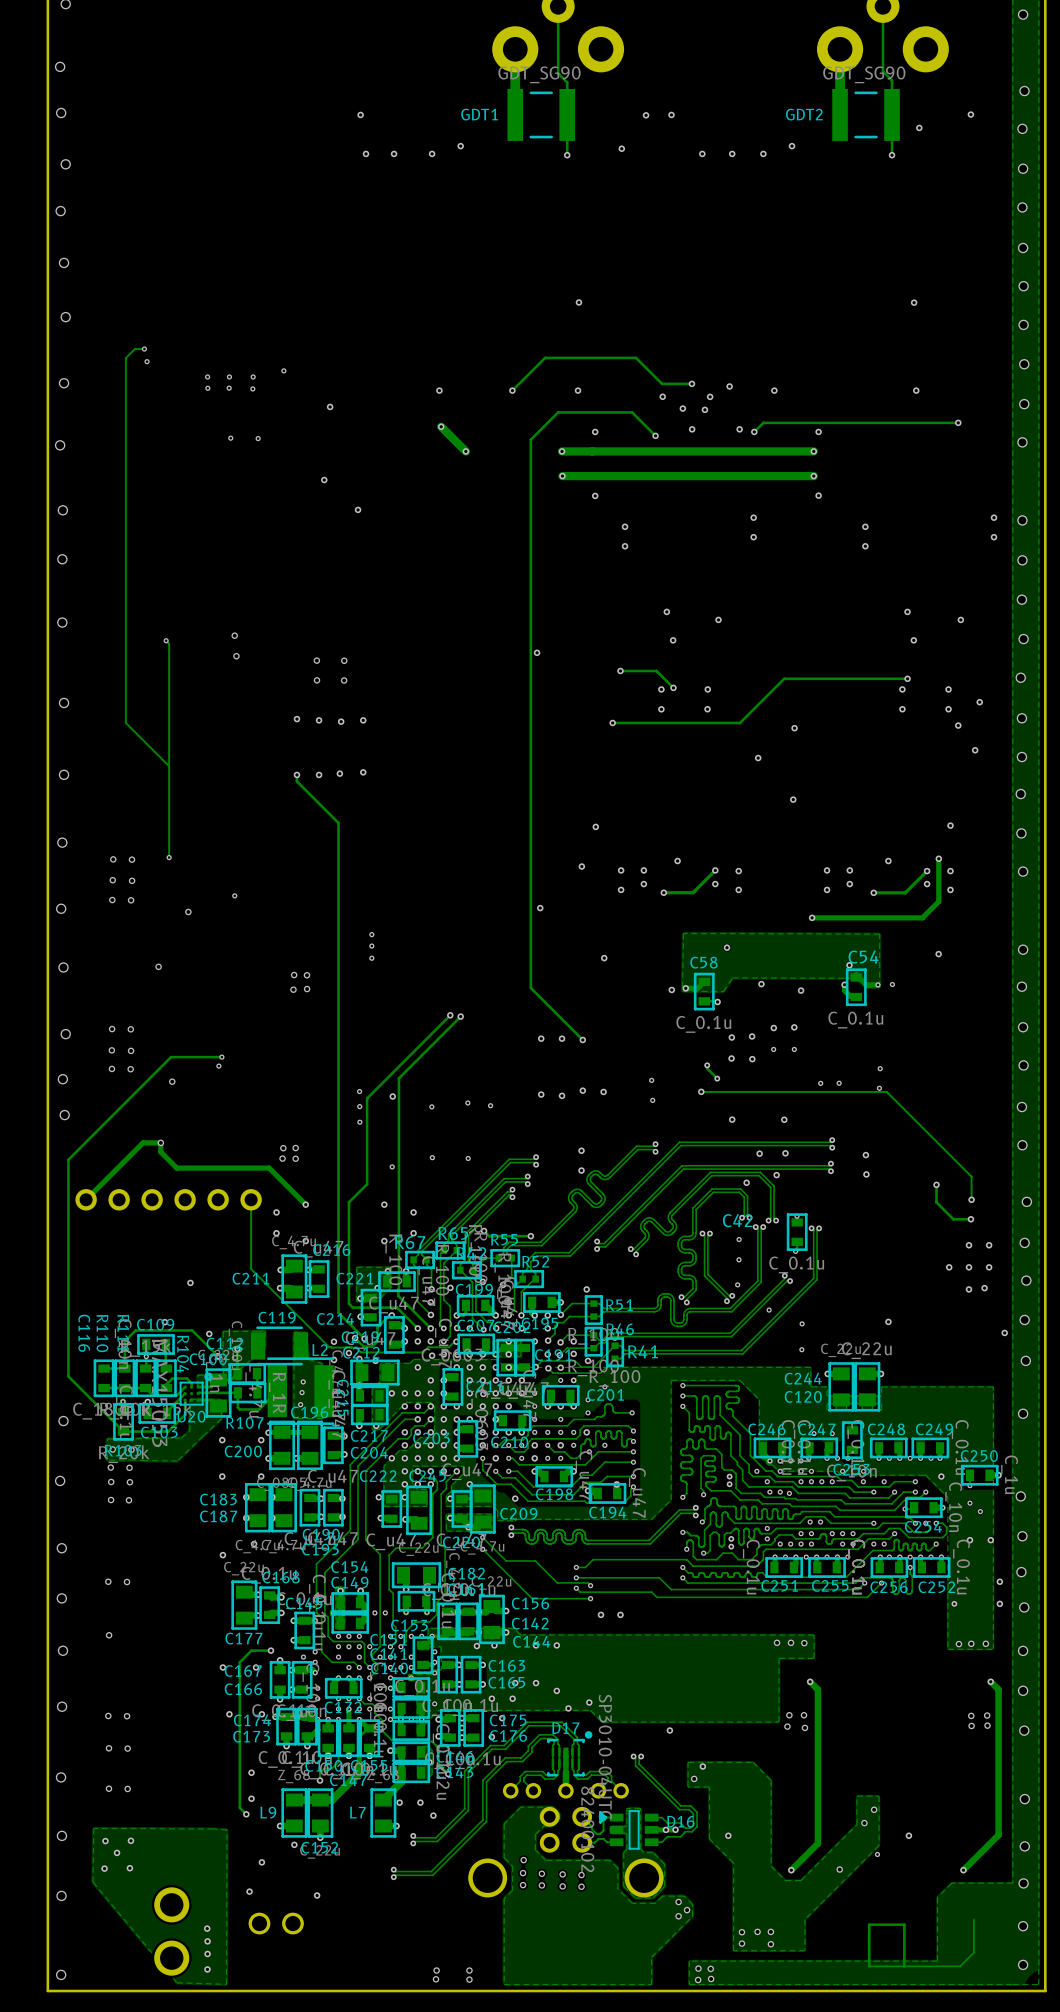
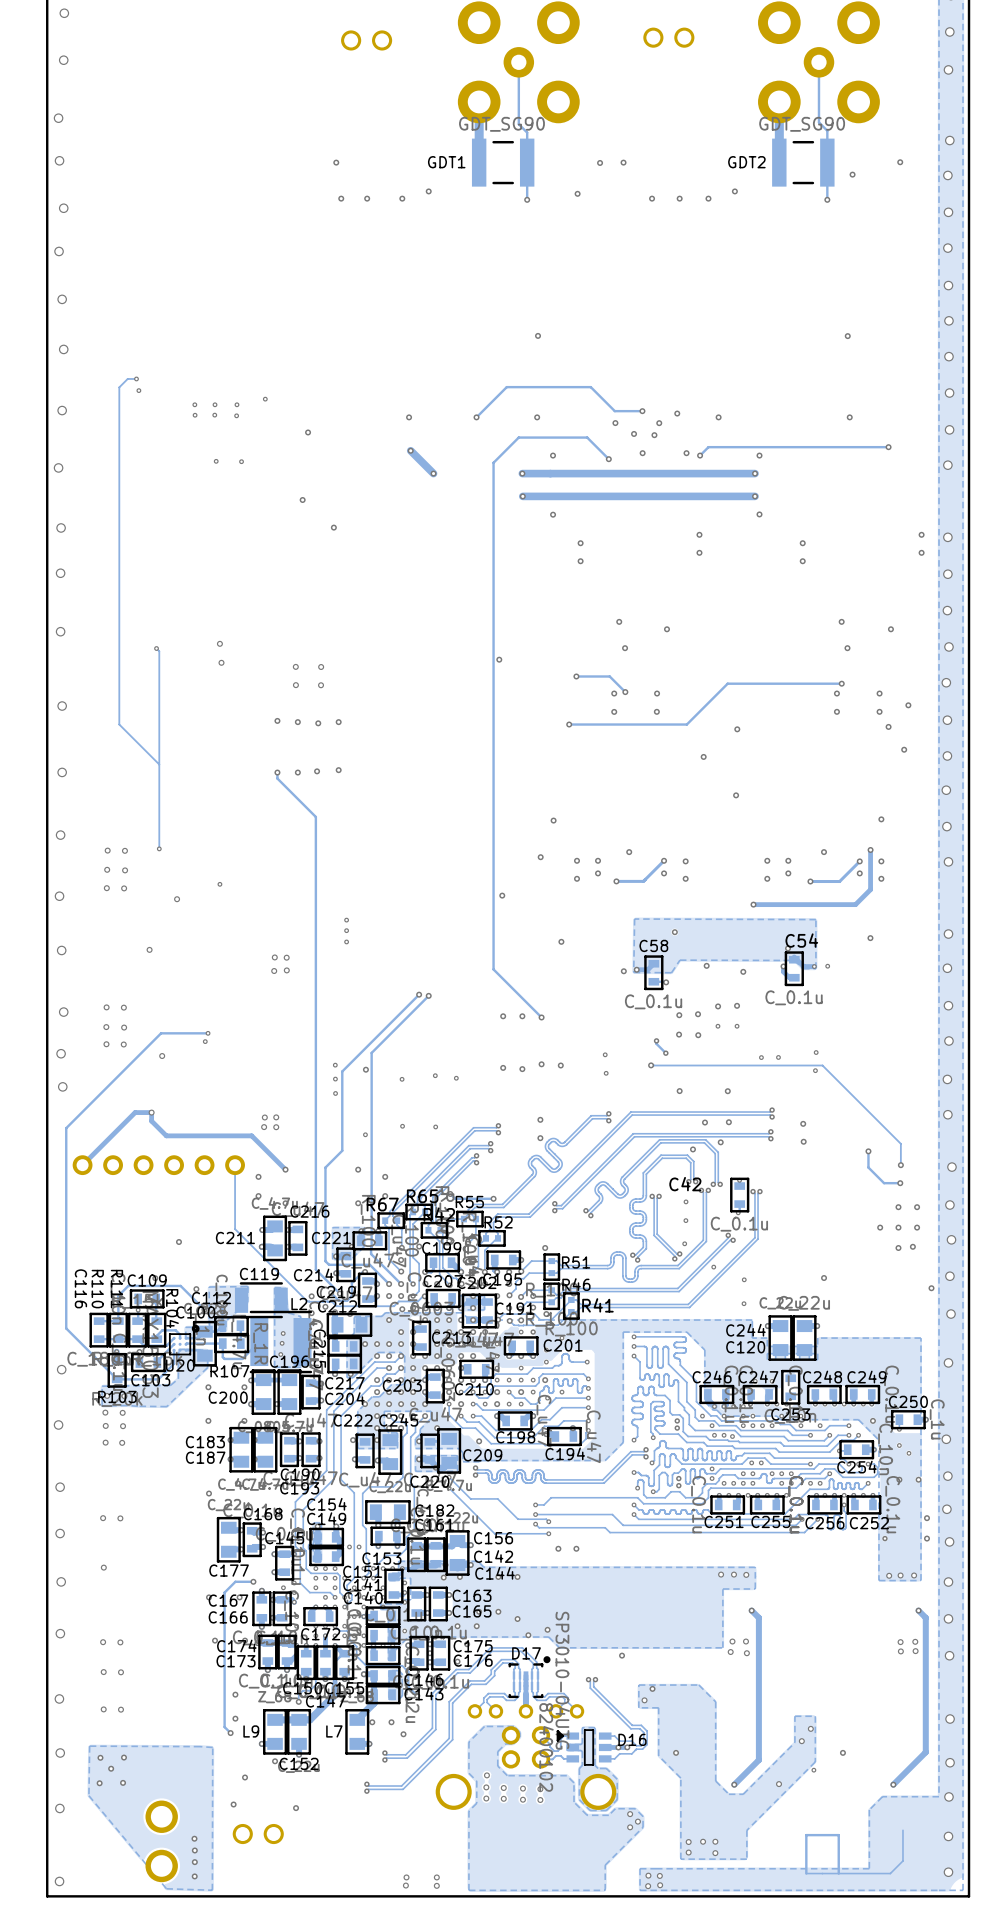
via: (880, 1068) -> none
via: none -> (816, 1052)
via: (879, 1088) -> none
via: none -> (815, 1070)

